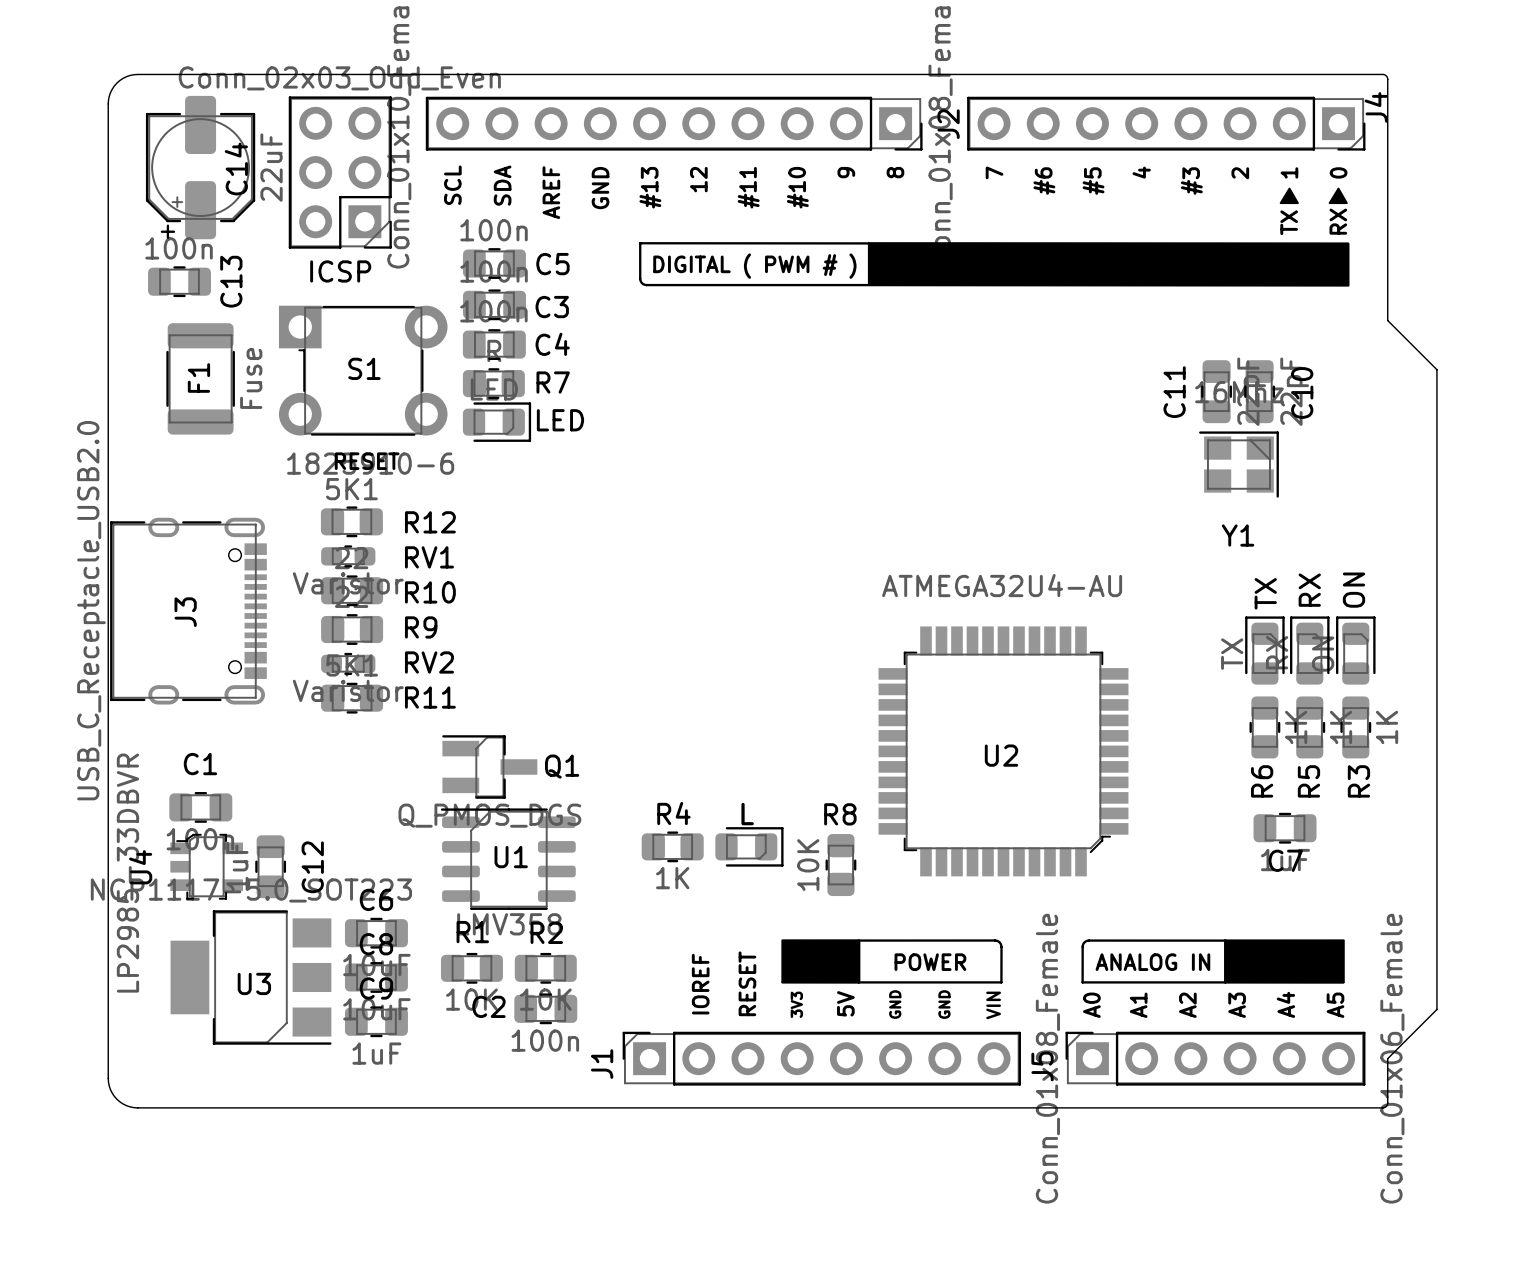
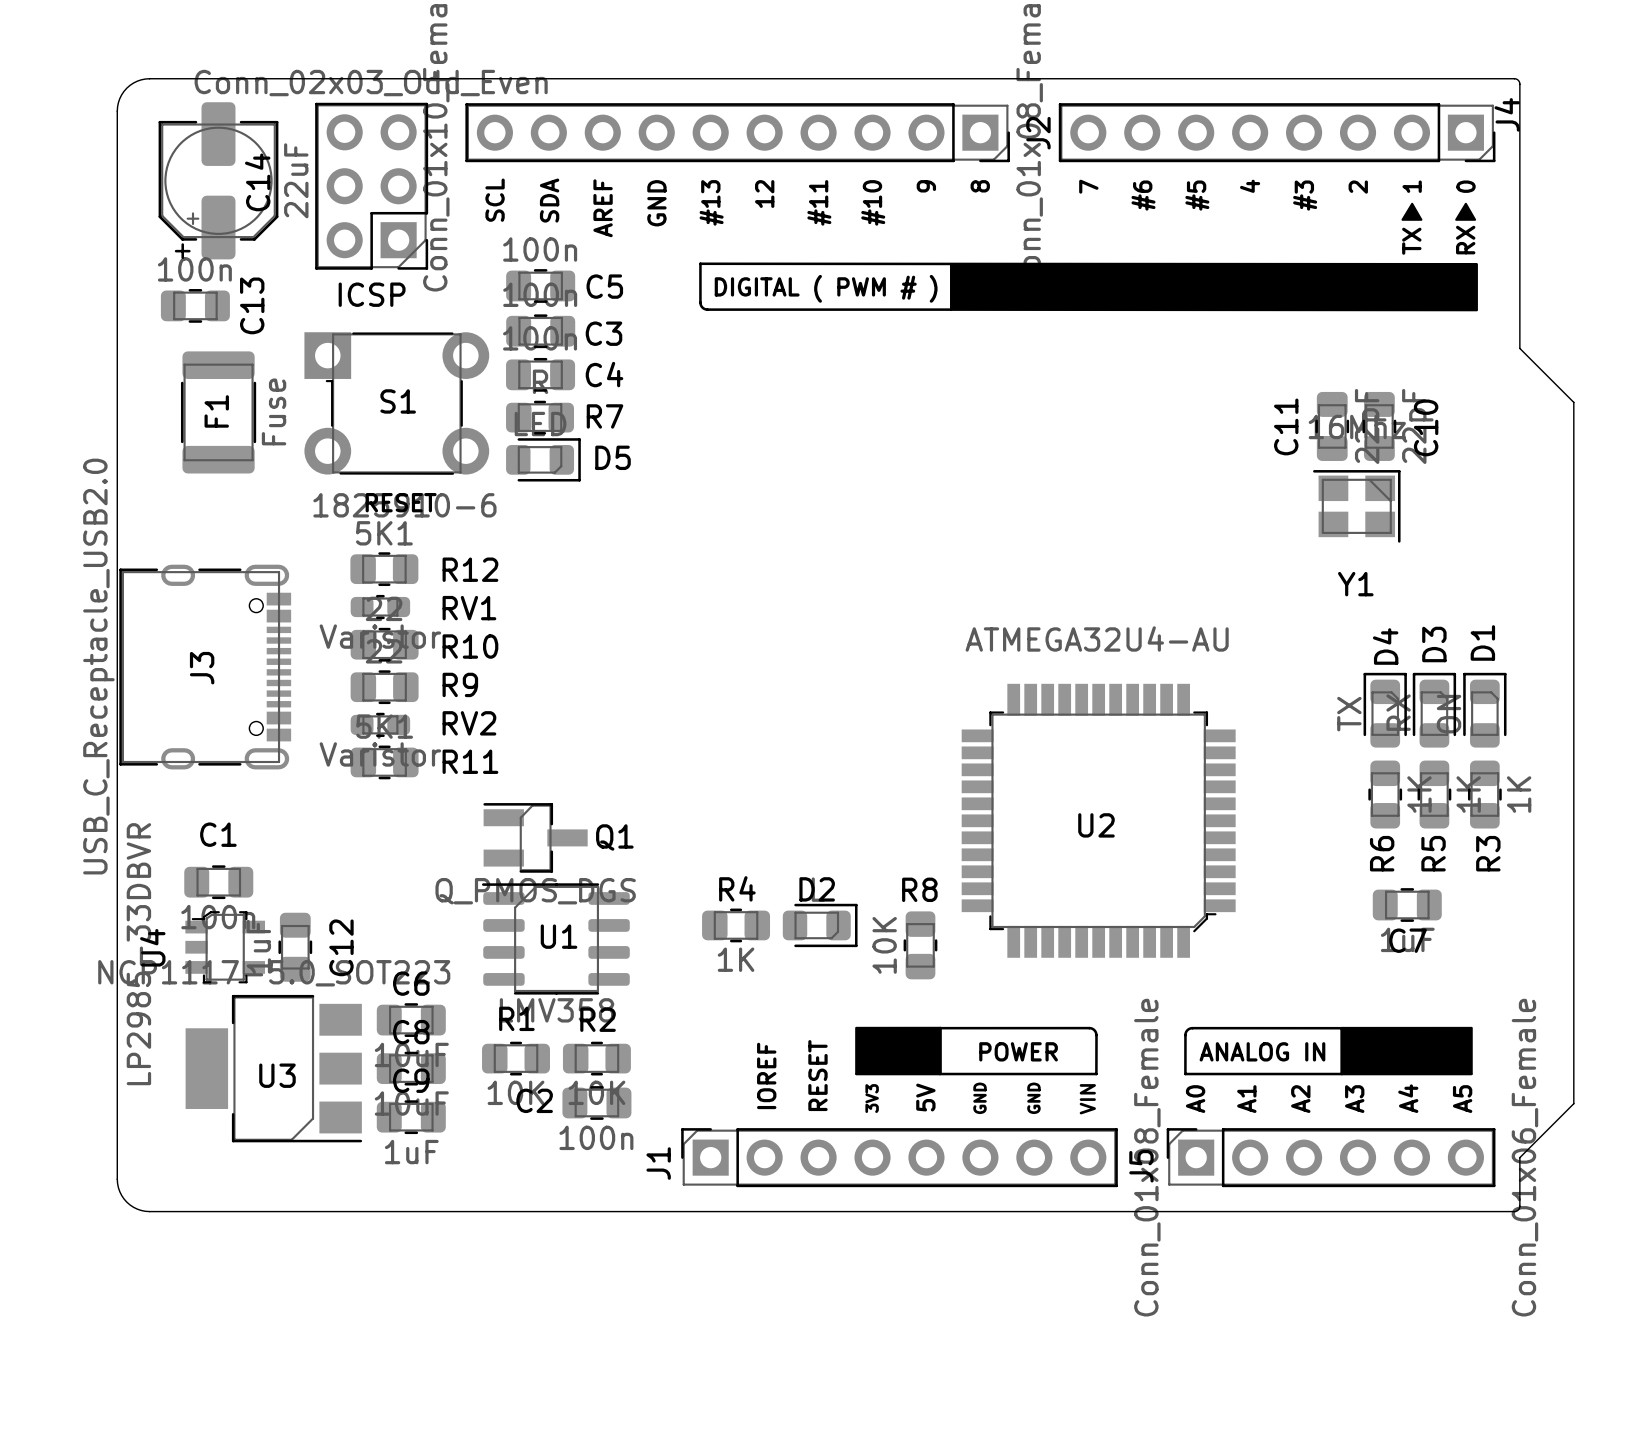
LED name: LED (560, 420) -> D5 (613, 457)
RX name: RX (1309, 590) -> D3 (1434, 644)
ON name: ON (1353, 590) -> D1 (1482, 642)
TX name: TX (1265, 593) -> D4 (1385, 646)
L name: L (747, 813) -> D2 (817, 889)

